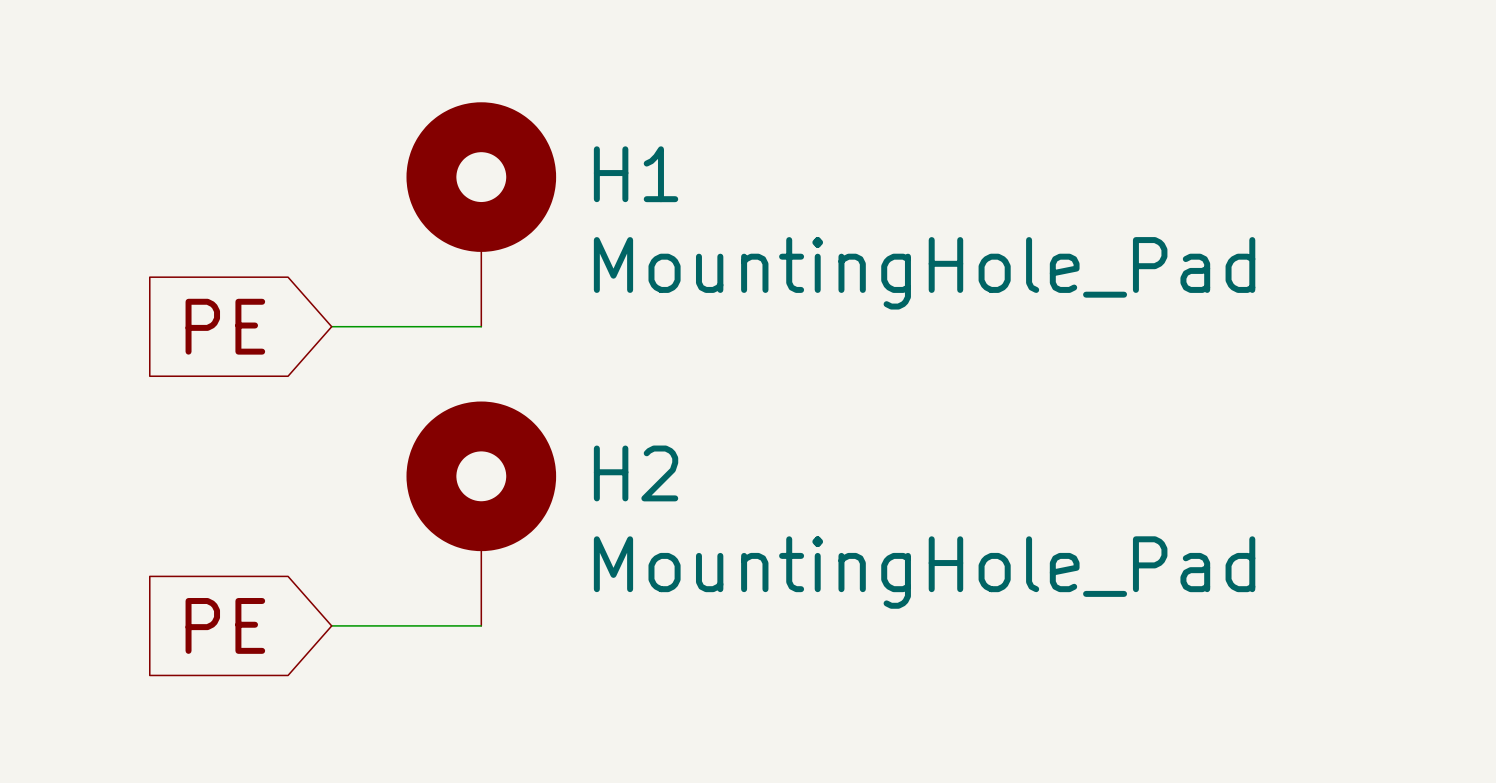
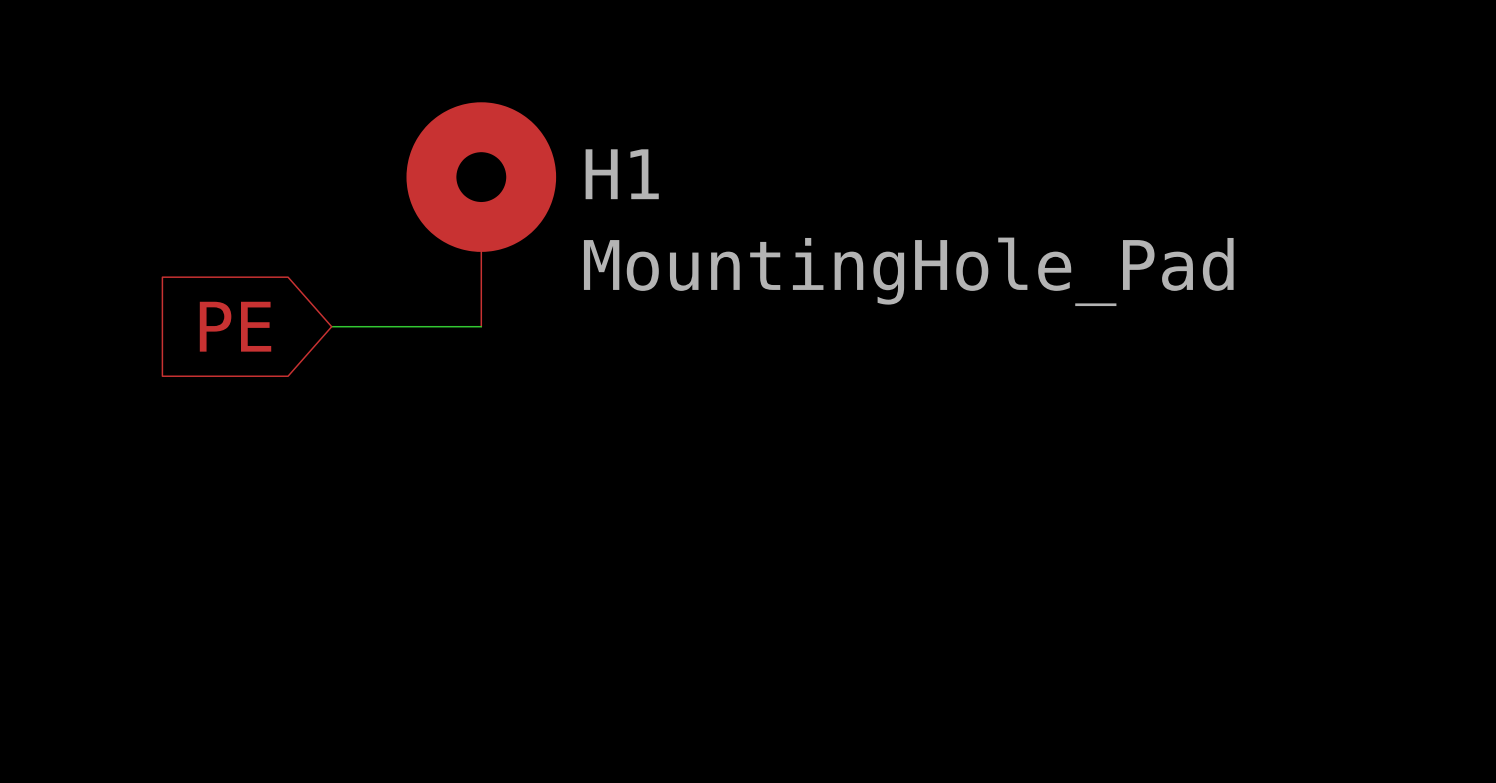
H2: MountingHole_Pad (481, 513) -> none
global label: PE (225, 625) -> none
wire: (331, 625) (481, 625) -> none

